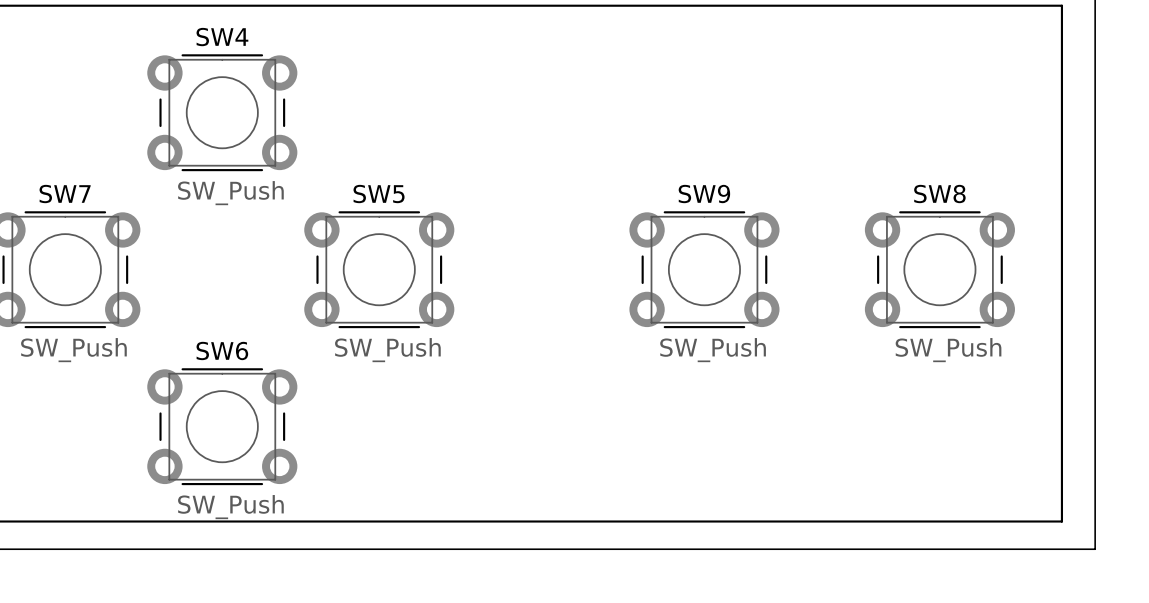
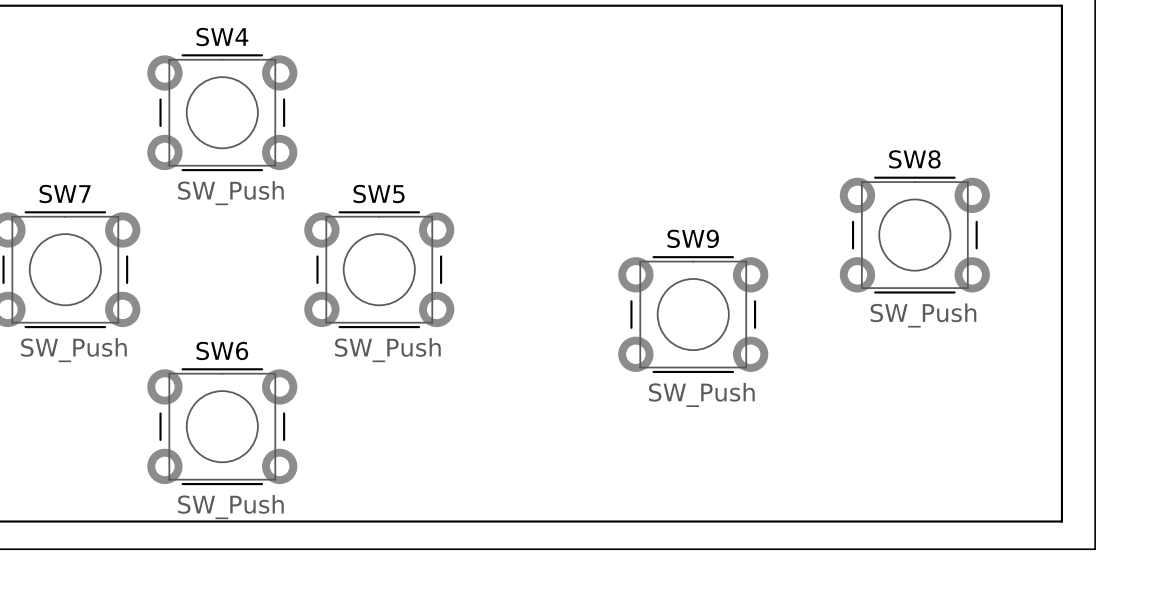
SW9 position: (704, 269) -> (693, 314)
SW8 position: (939, 269) -> (914, 235)

